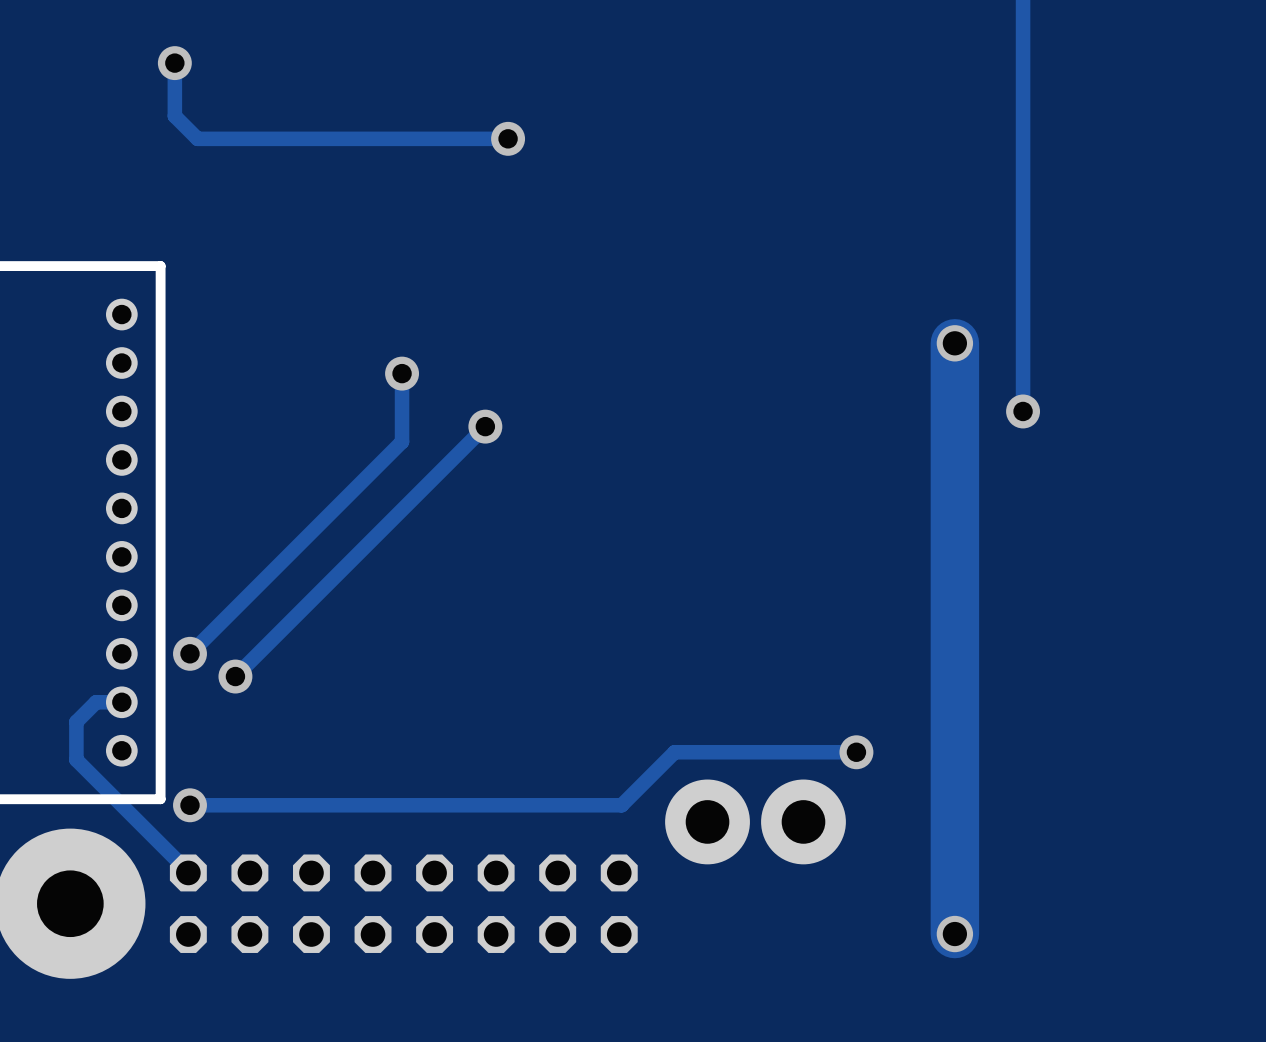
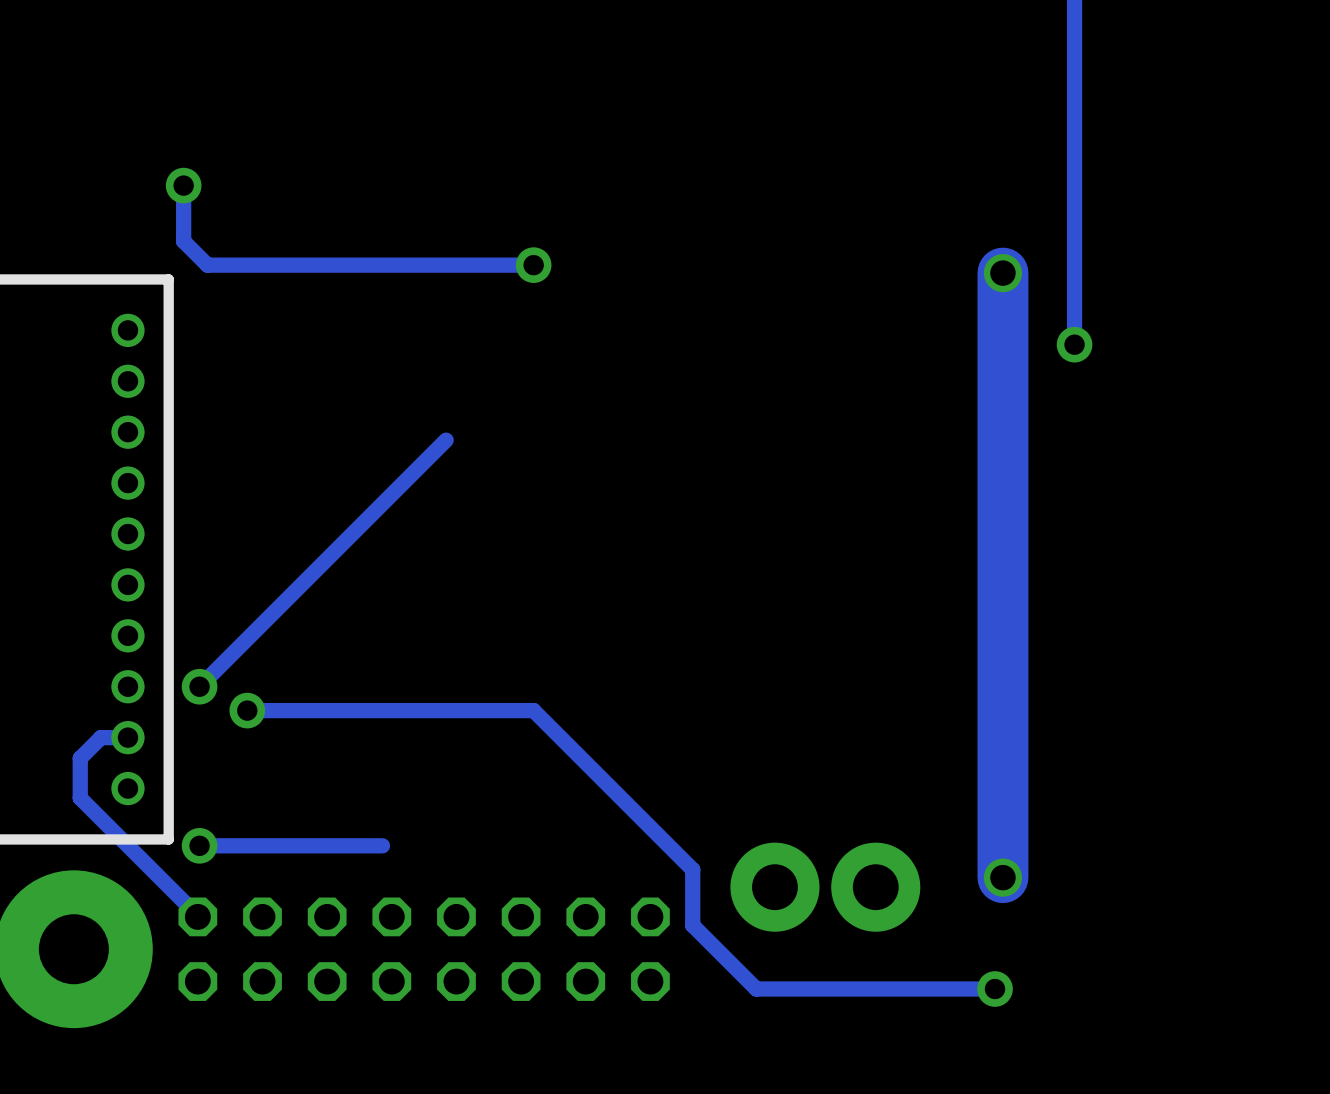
track: (174, 63) (174, 116) (197, 138) (508, 138) -> (183, 185) (183, 241) (207, 265) (533, 265)
via position: (174, 63) -> (183, 185)
via: (508, 138) -> none
via: none -> (533, 265)
track: (1023, 328) (1023, 411) -> (1002, 273) (1002, 360)
via position: (954, 343) -> (1002, 273)
track: (402, 373) (402, 441) -> (446, 440) (422, 464)
via: (402, 373) -> none
via position: (1023, 411) -> (1074, 344)
track: (485, 426) (235, 676) -> (995, 989) (756, 989) (692, 925) (692, 869) (533, 710) (247, 710)
via: (485, 426) -> none
track: (856, 752) (674, 752) (621, 805) (364, 805) -> none
via: (856, 752) -> none
part position: (755, 821) -> (825, 887)
track: (954, 835) (954, 934) -> none
via position: (954, 934) -> (1002, 877)
via: none -> (995, 989)

